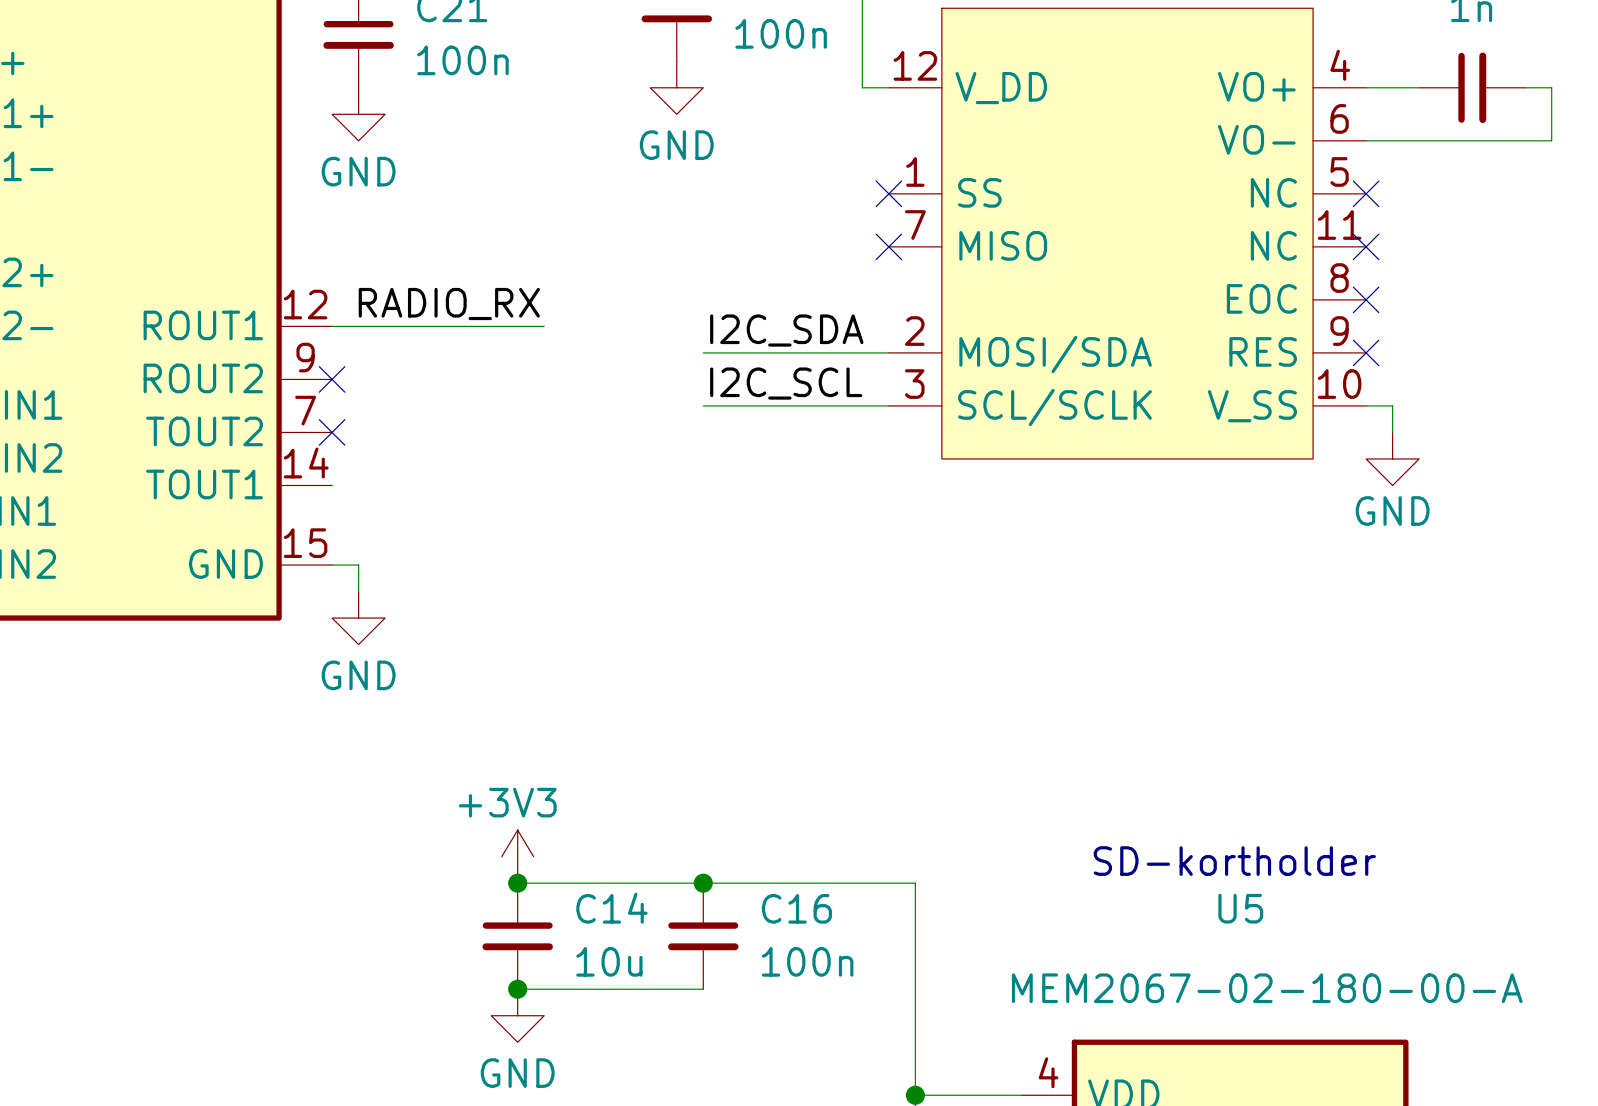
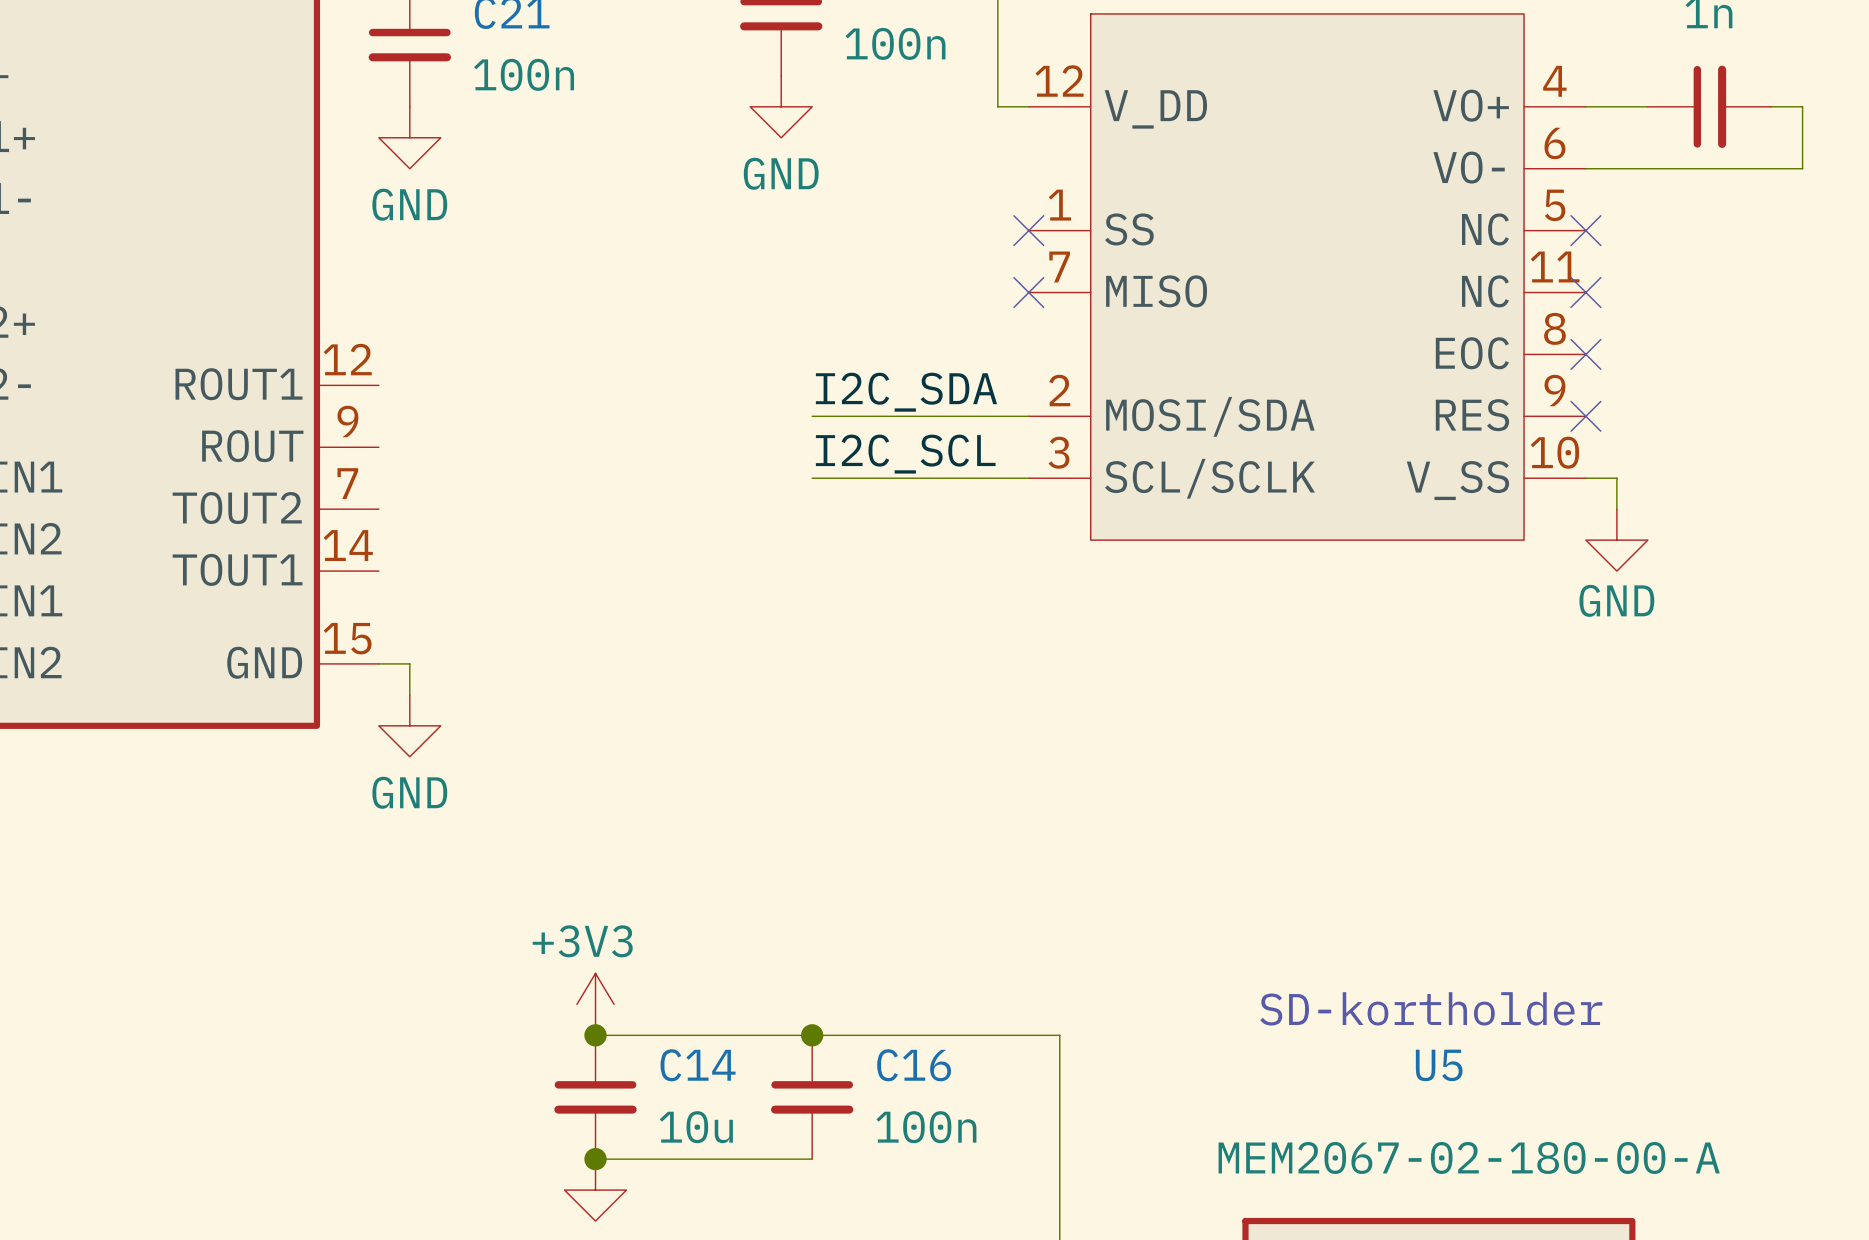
label: RADIO_RX (449, 304) -> none
wire: (332, 326) (544, 326) -> none
part pin name: ROUT2 (203, 378) -> ROUT (252, 446)
no-connect mark: (332, 379) -> none
no-connect mark: (332, 432) -> none

